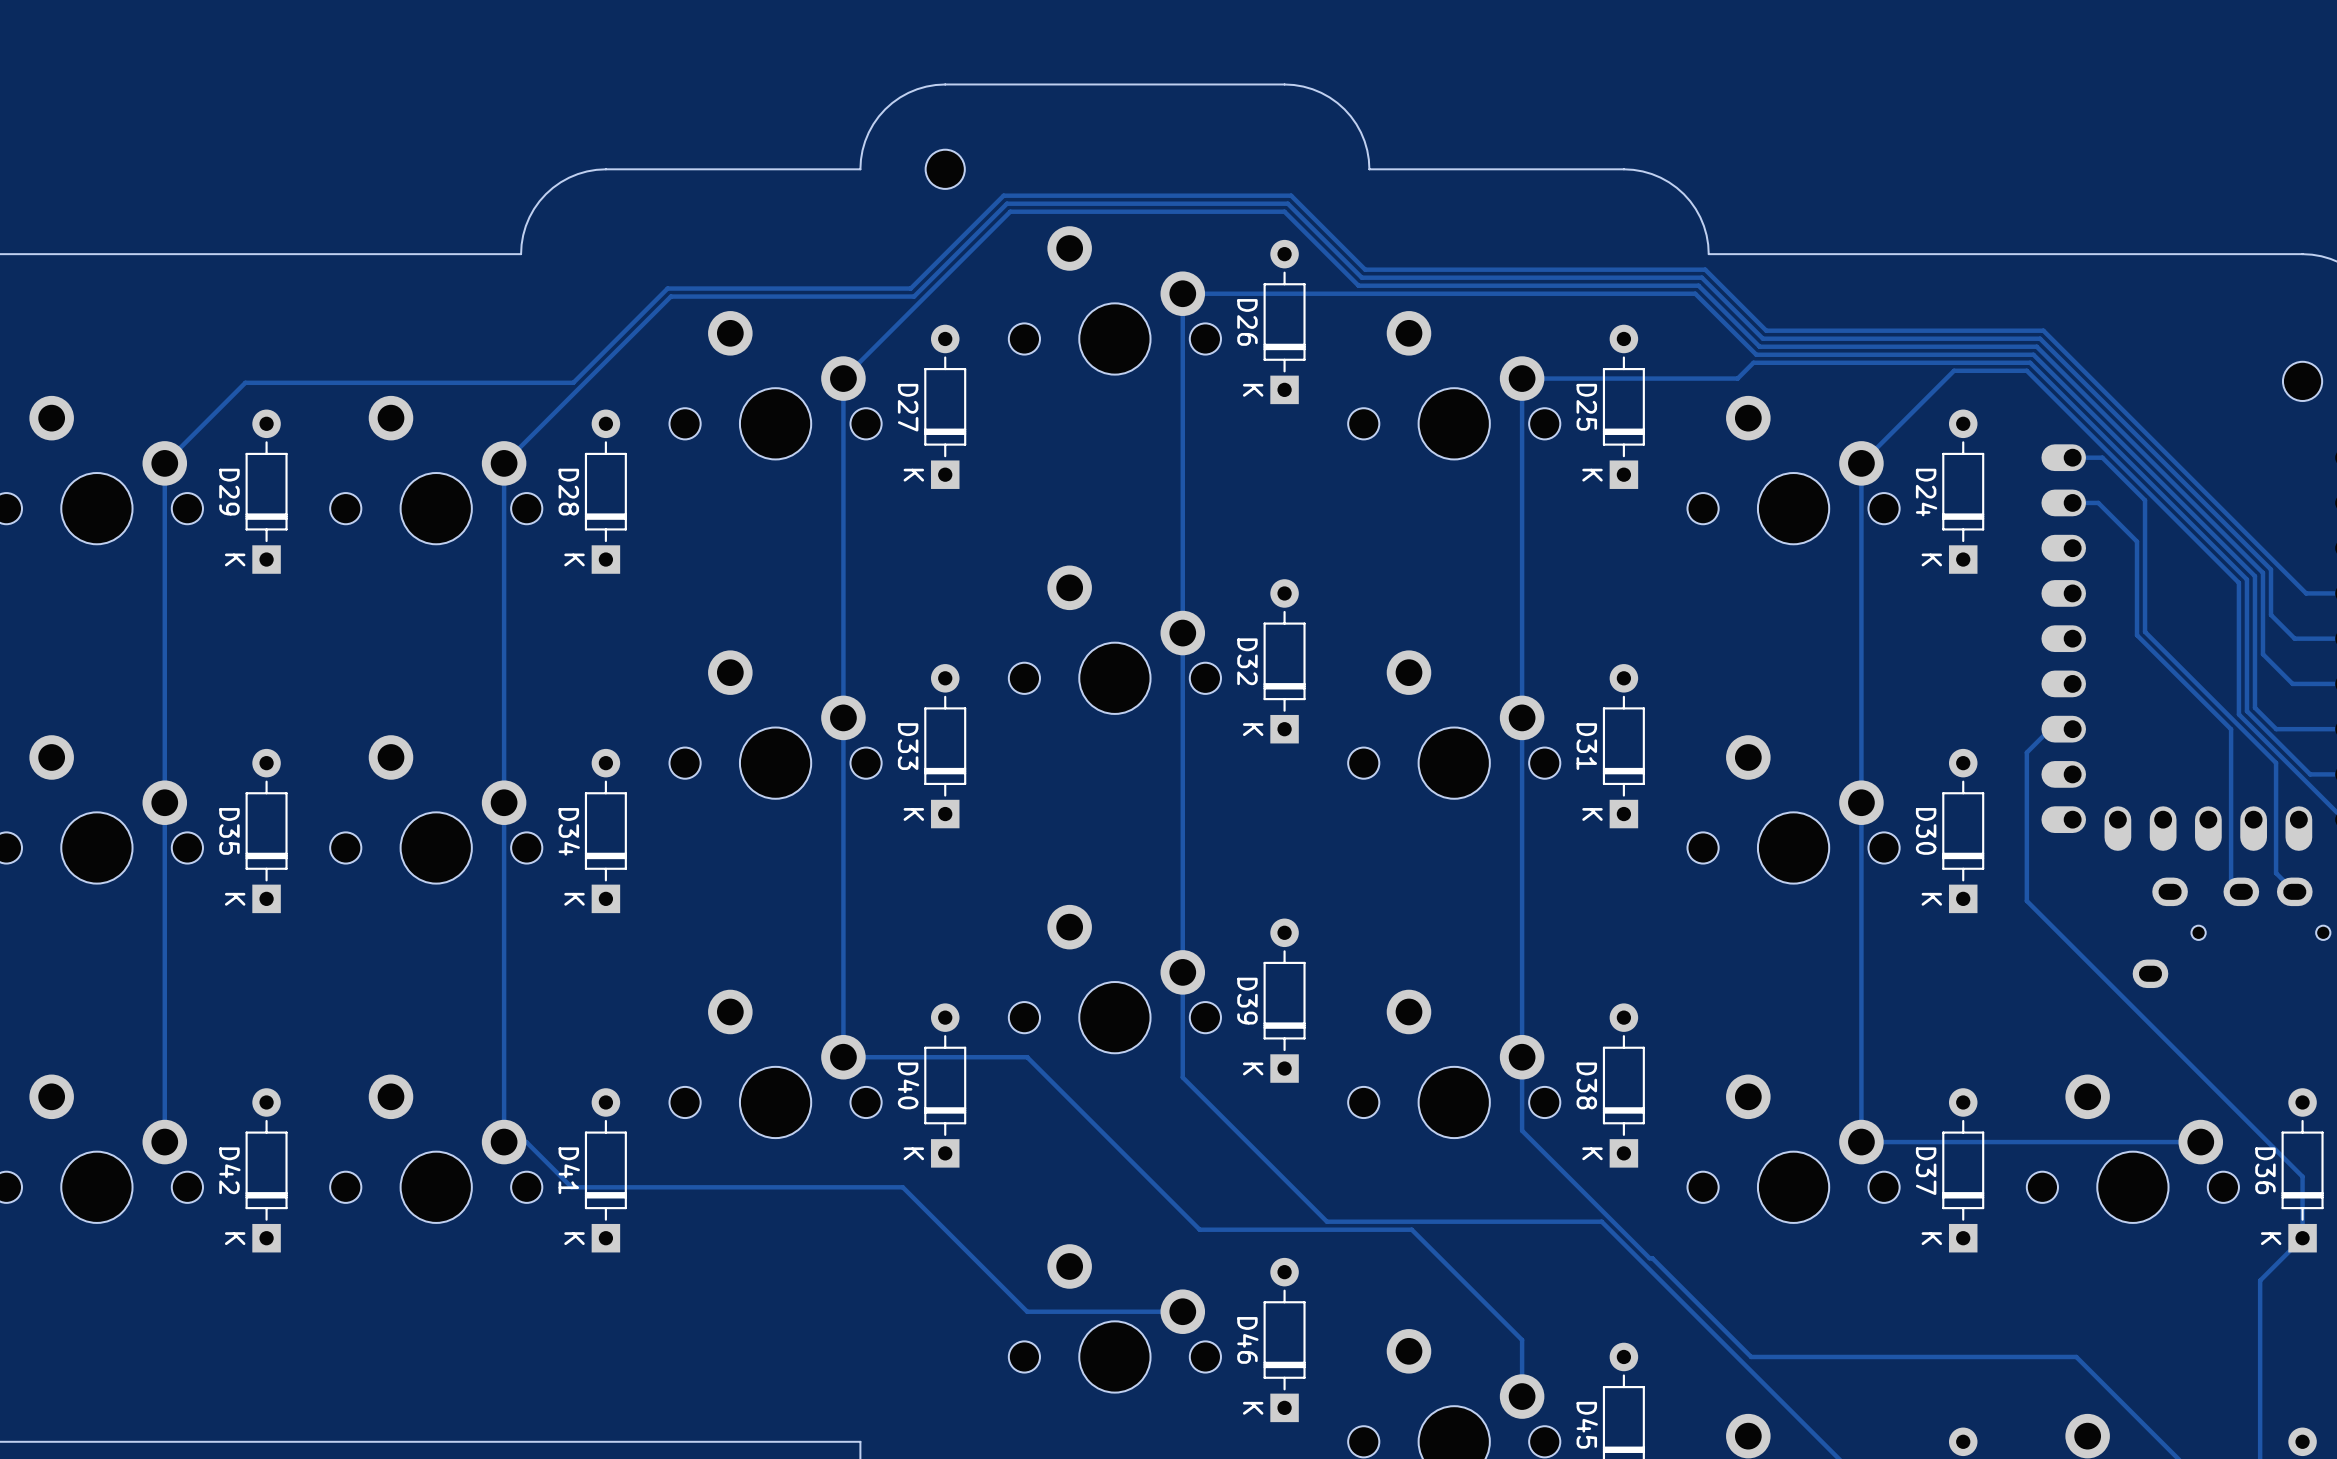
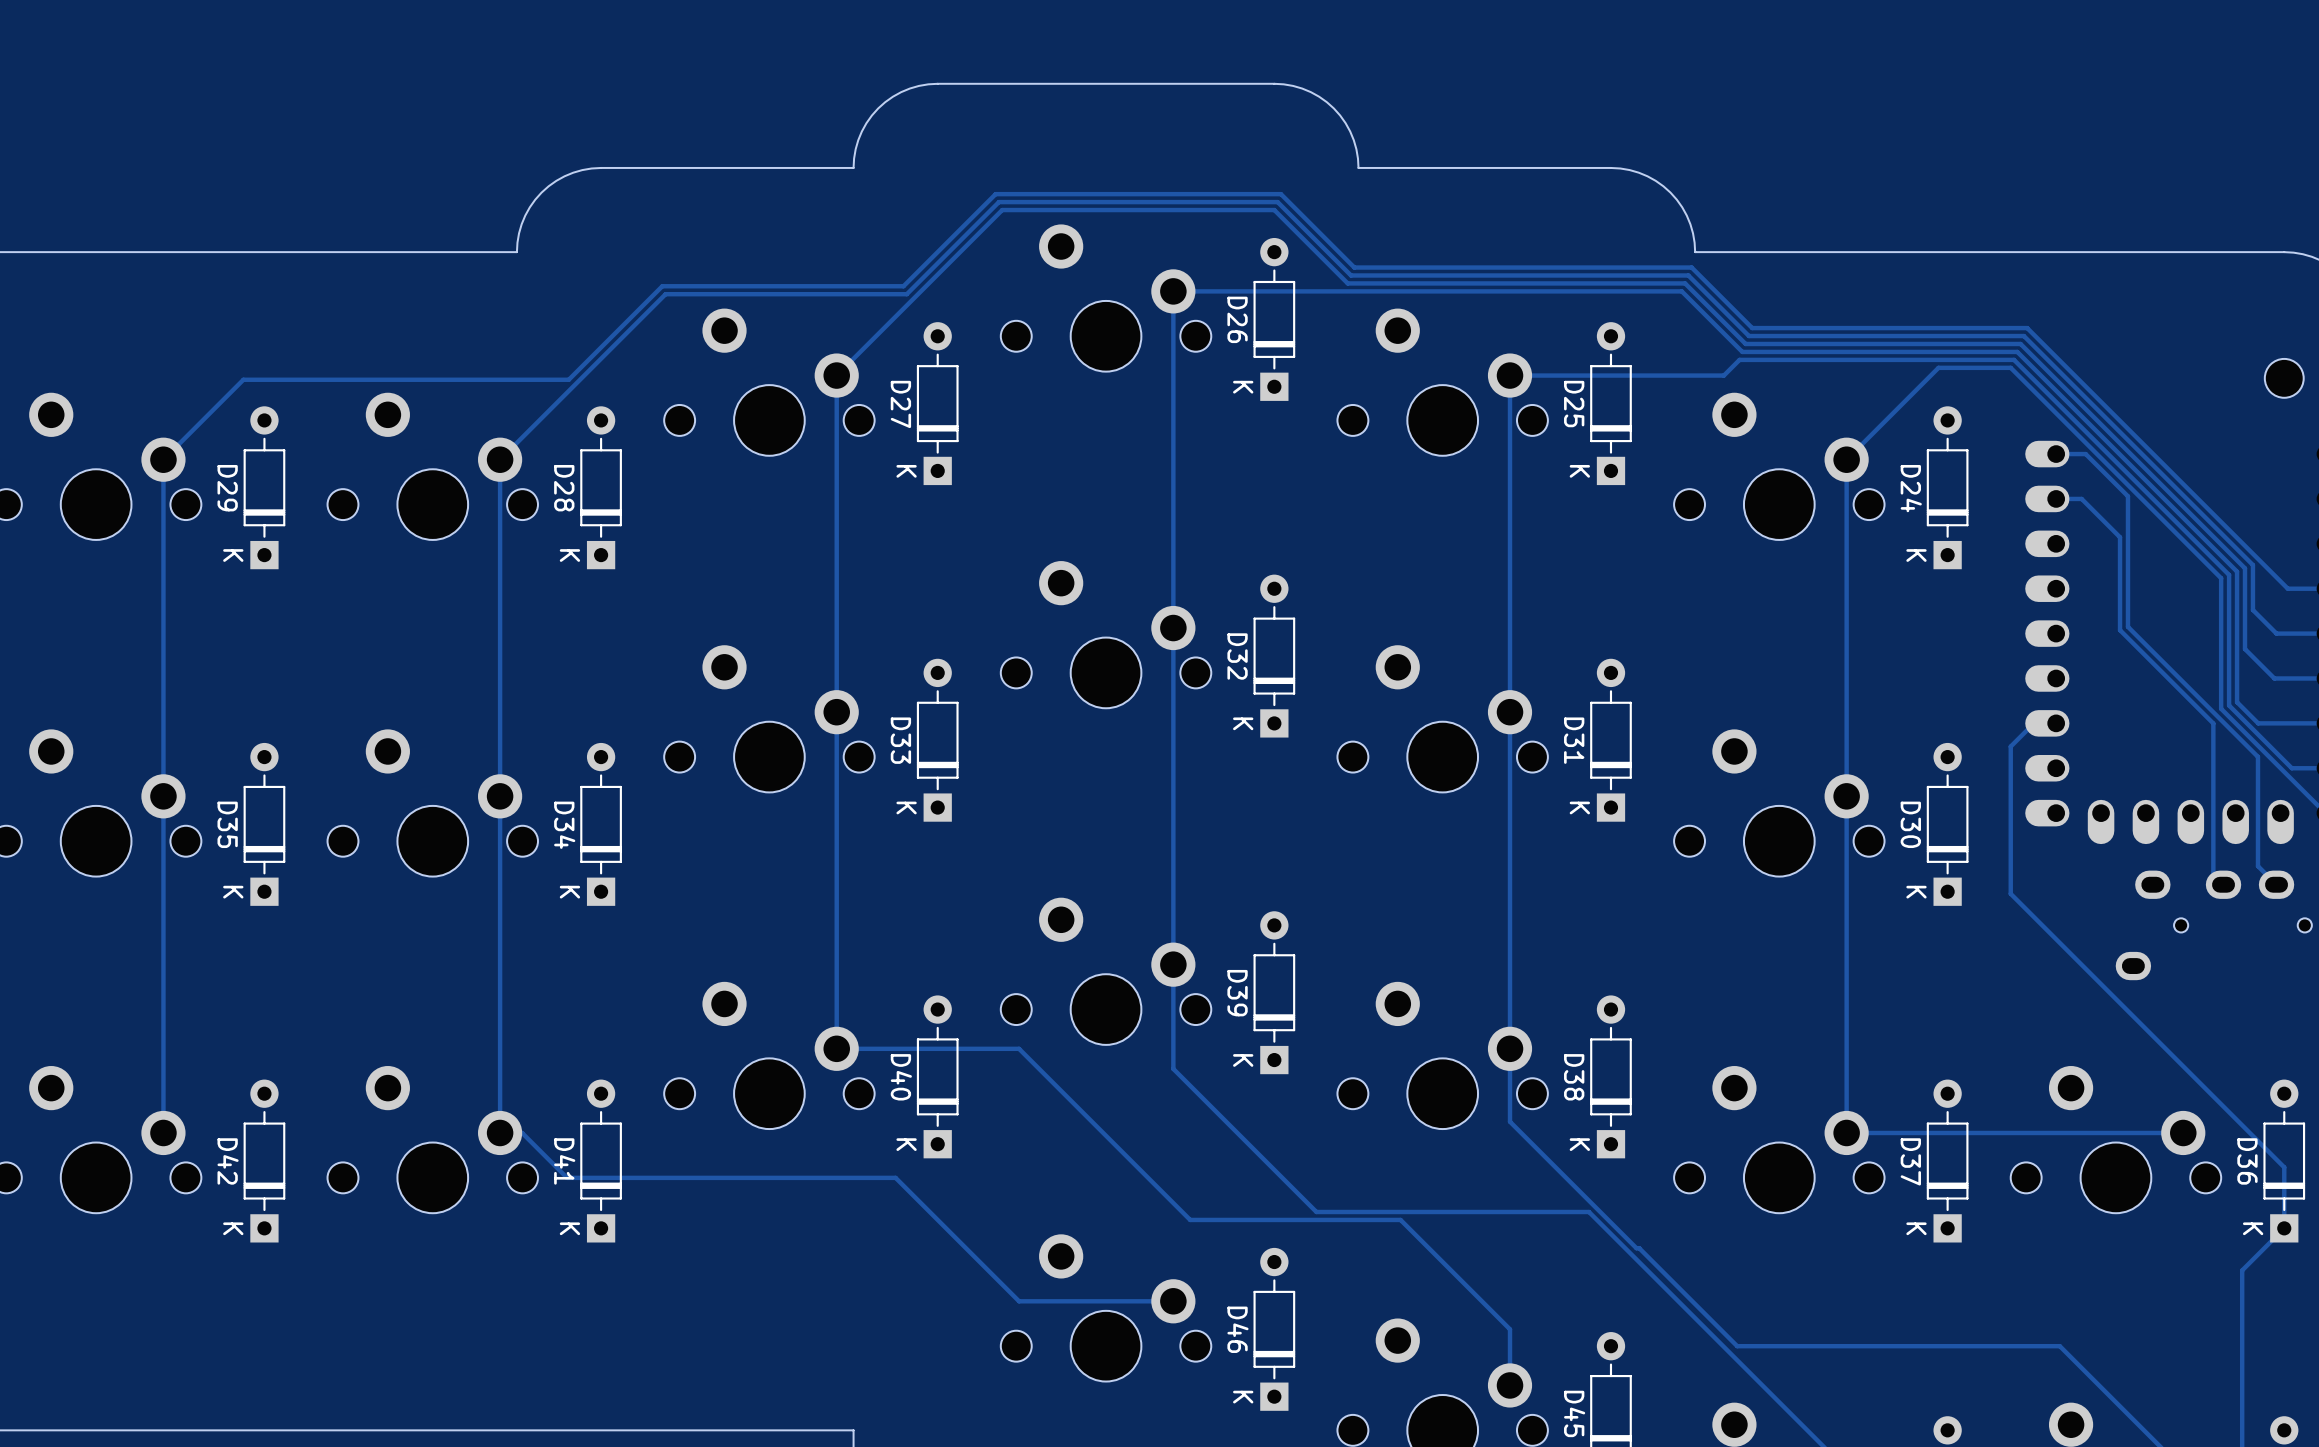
part: (945, 169) -> none

